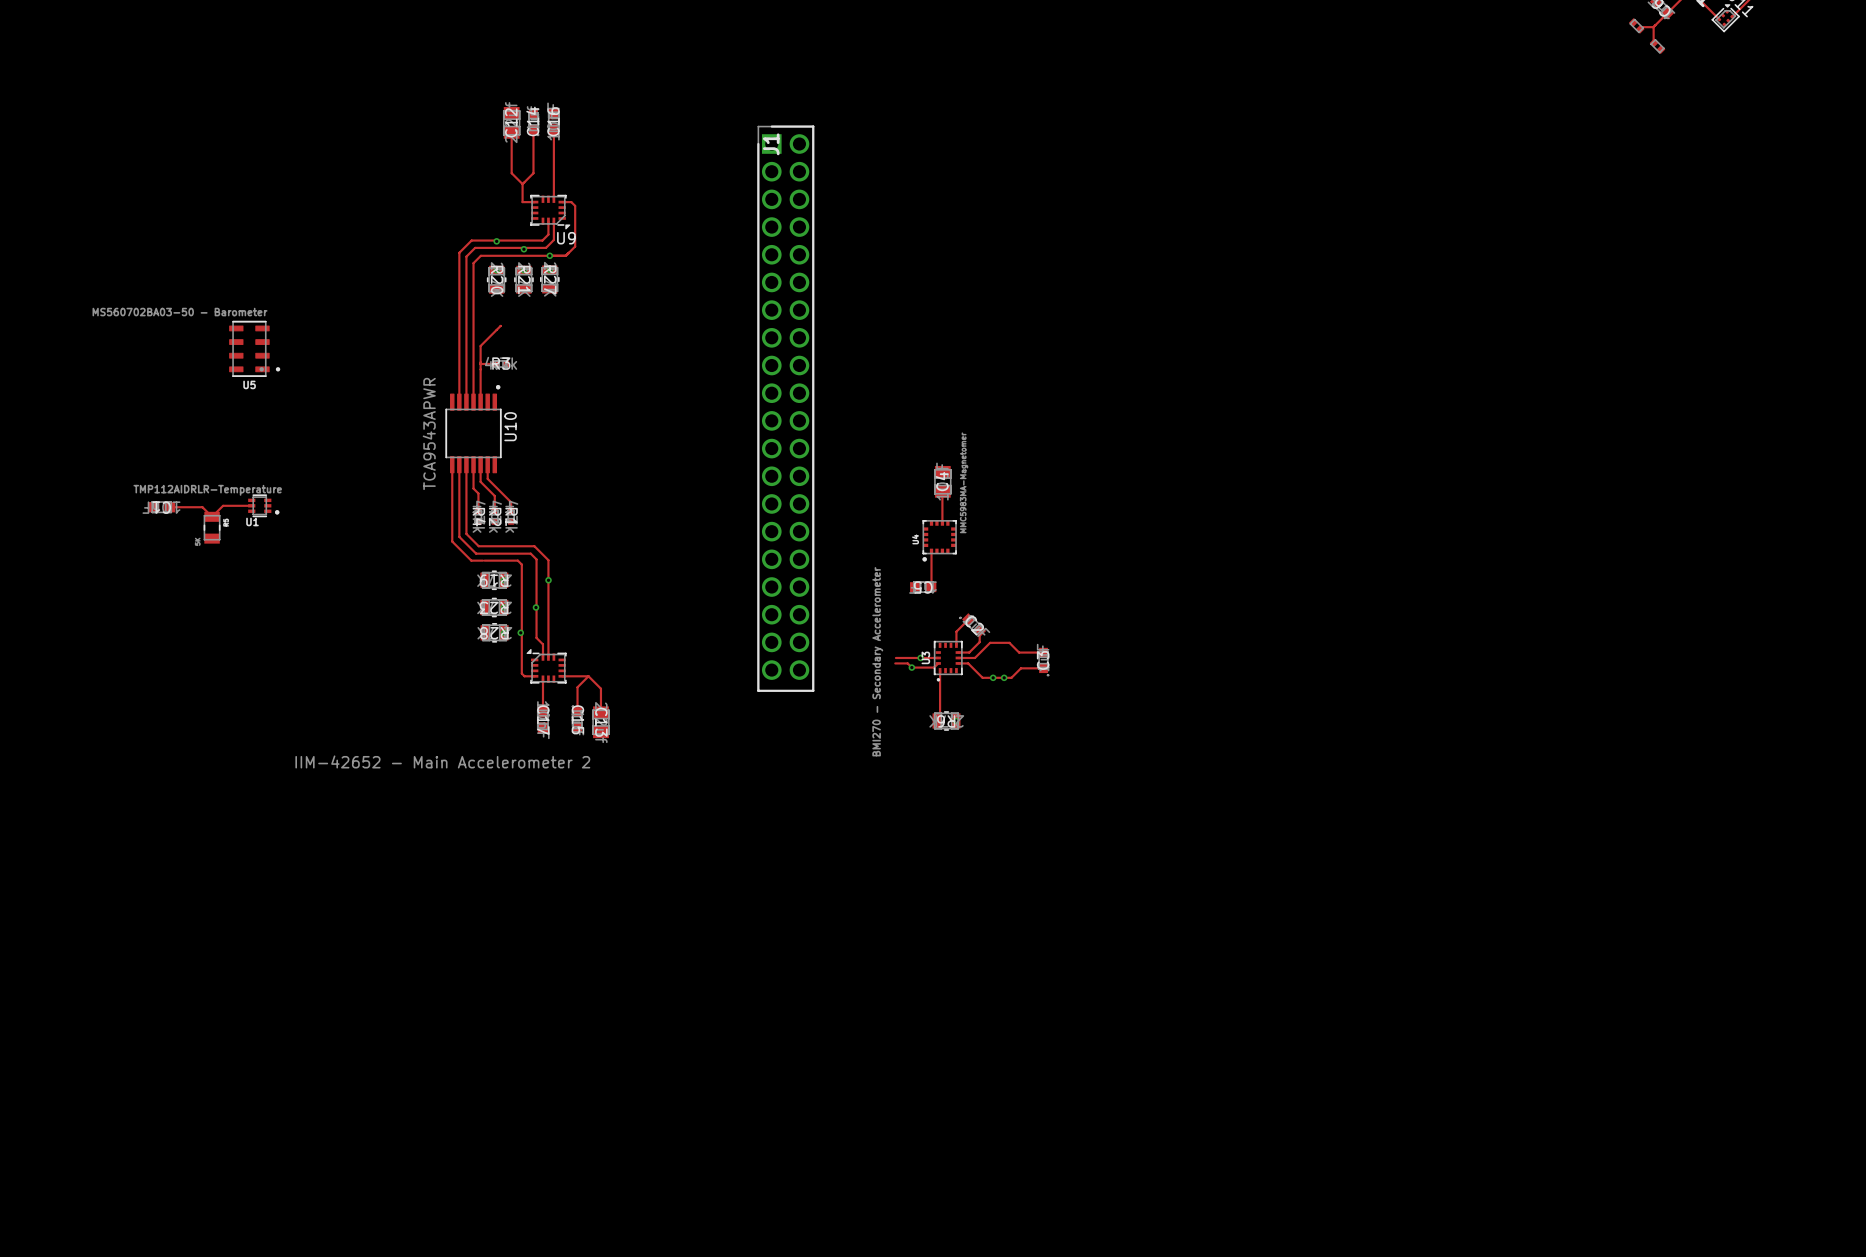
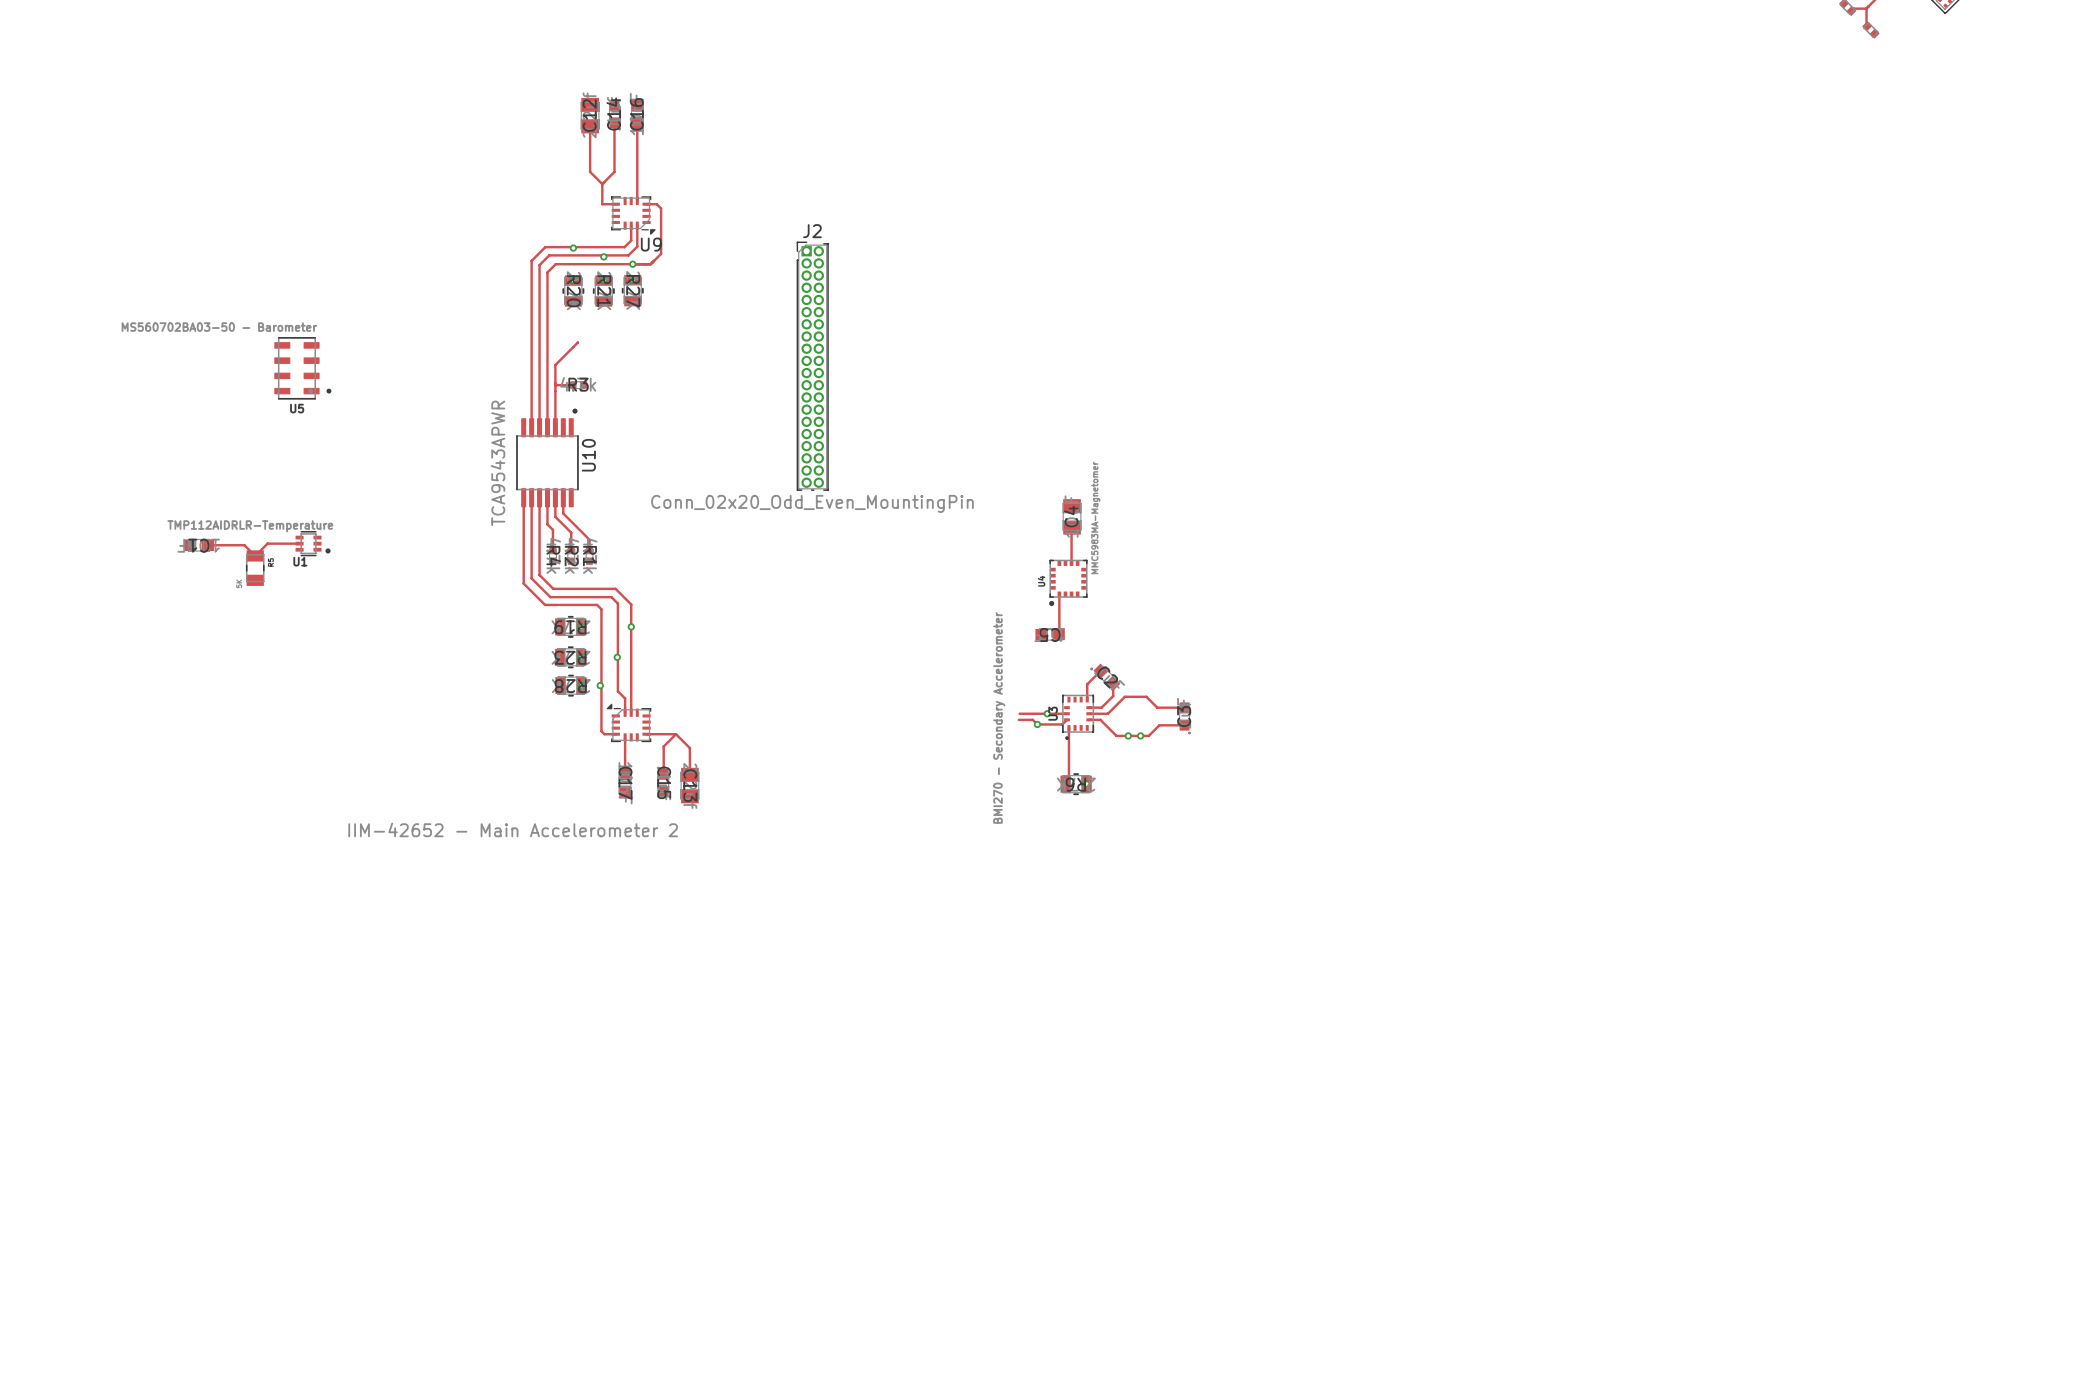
J2: none -> Conn_02x20_Odd_Even_MountingPin (812, 366)
J1: (785, 408) -> none

